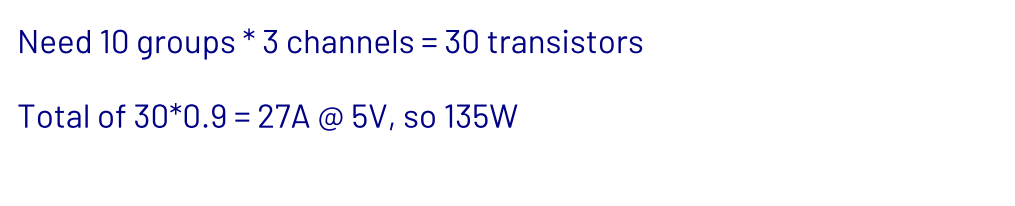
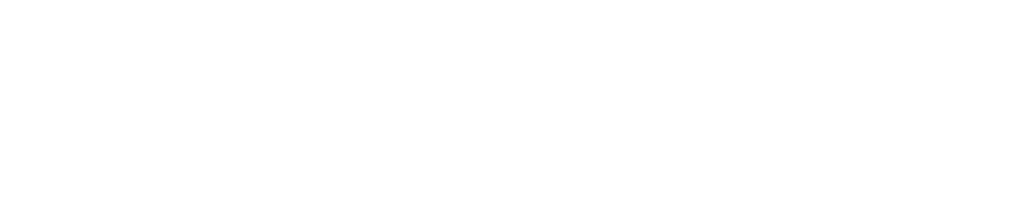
text: Need 10 groups * 3 channels = 30 transistors (331, 44) -> none
text: Total of 30*0.9 = 27A @ 5V, so 135W (267, 116) -> none

